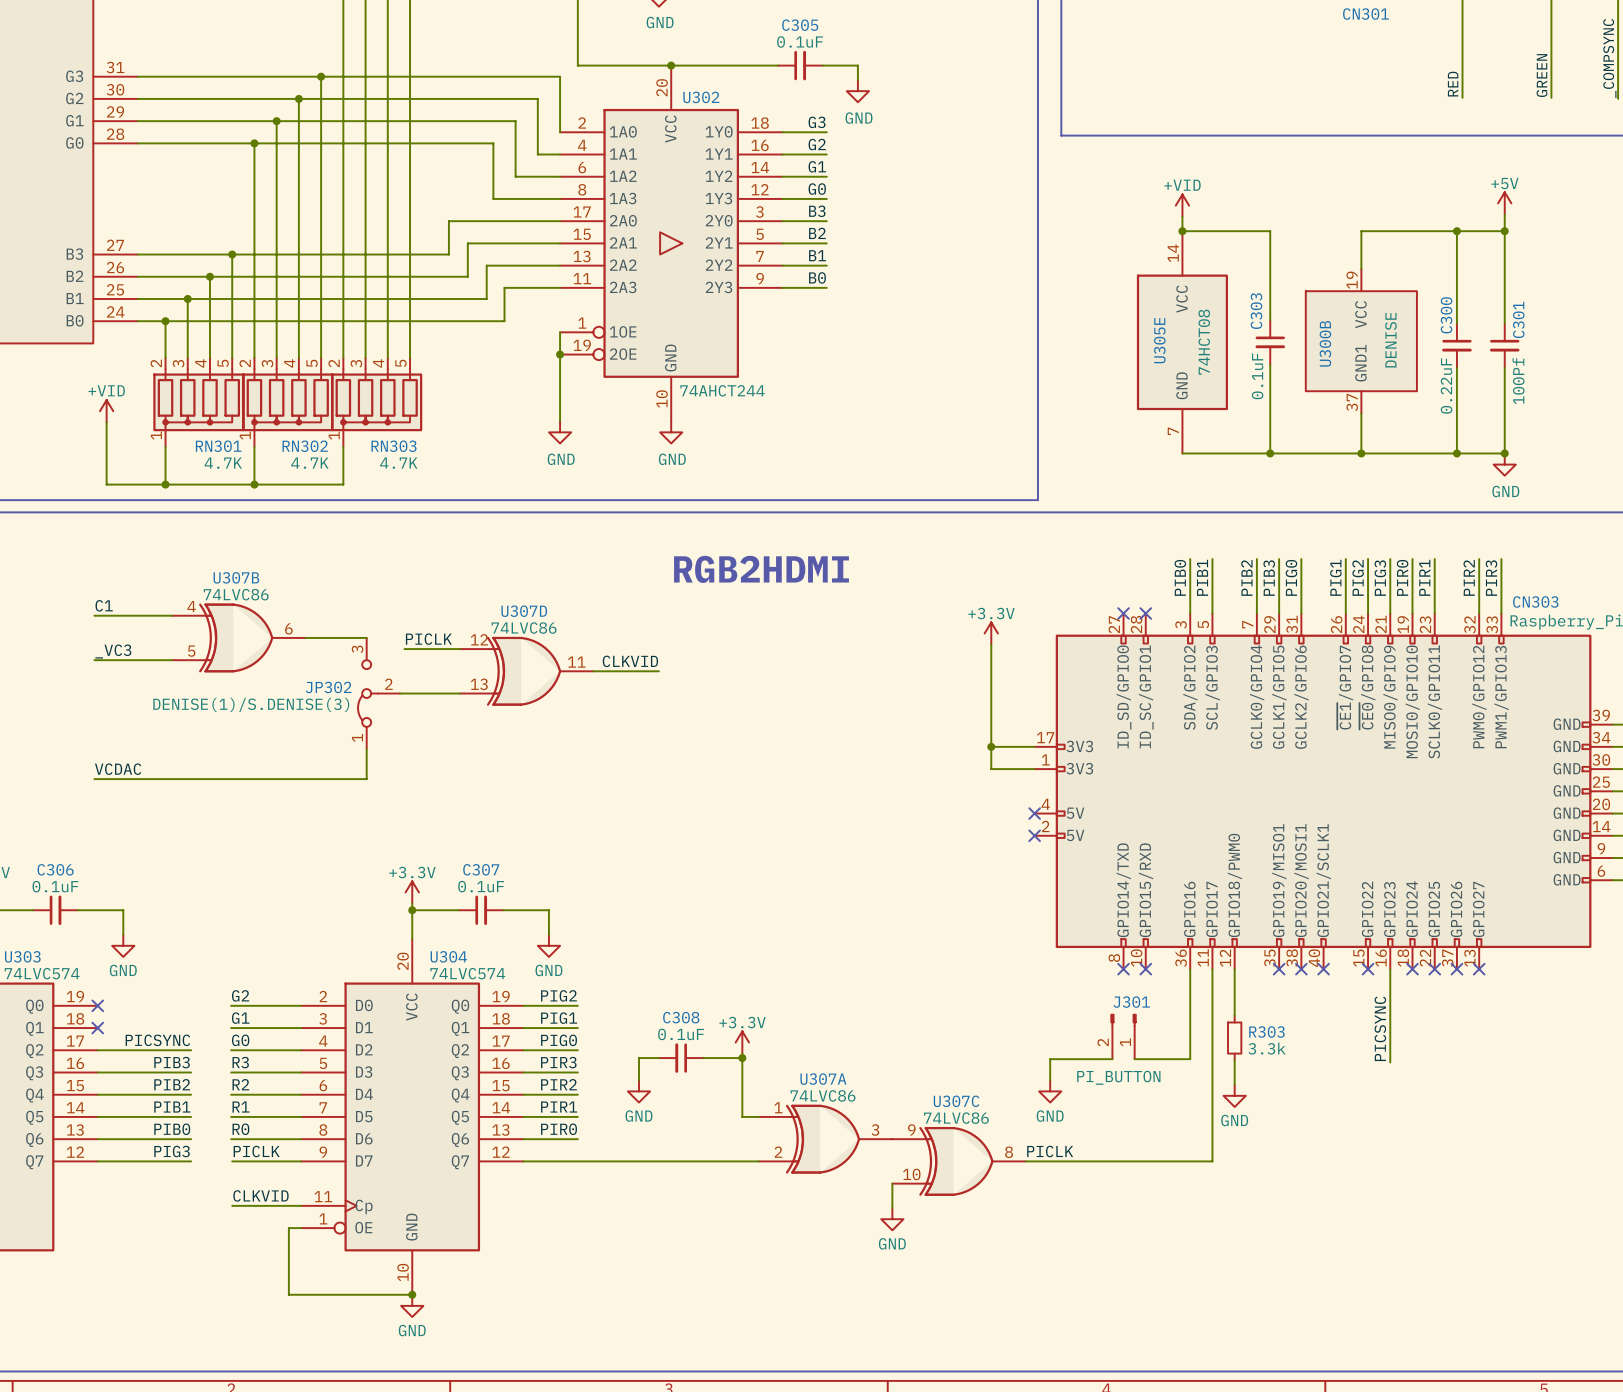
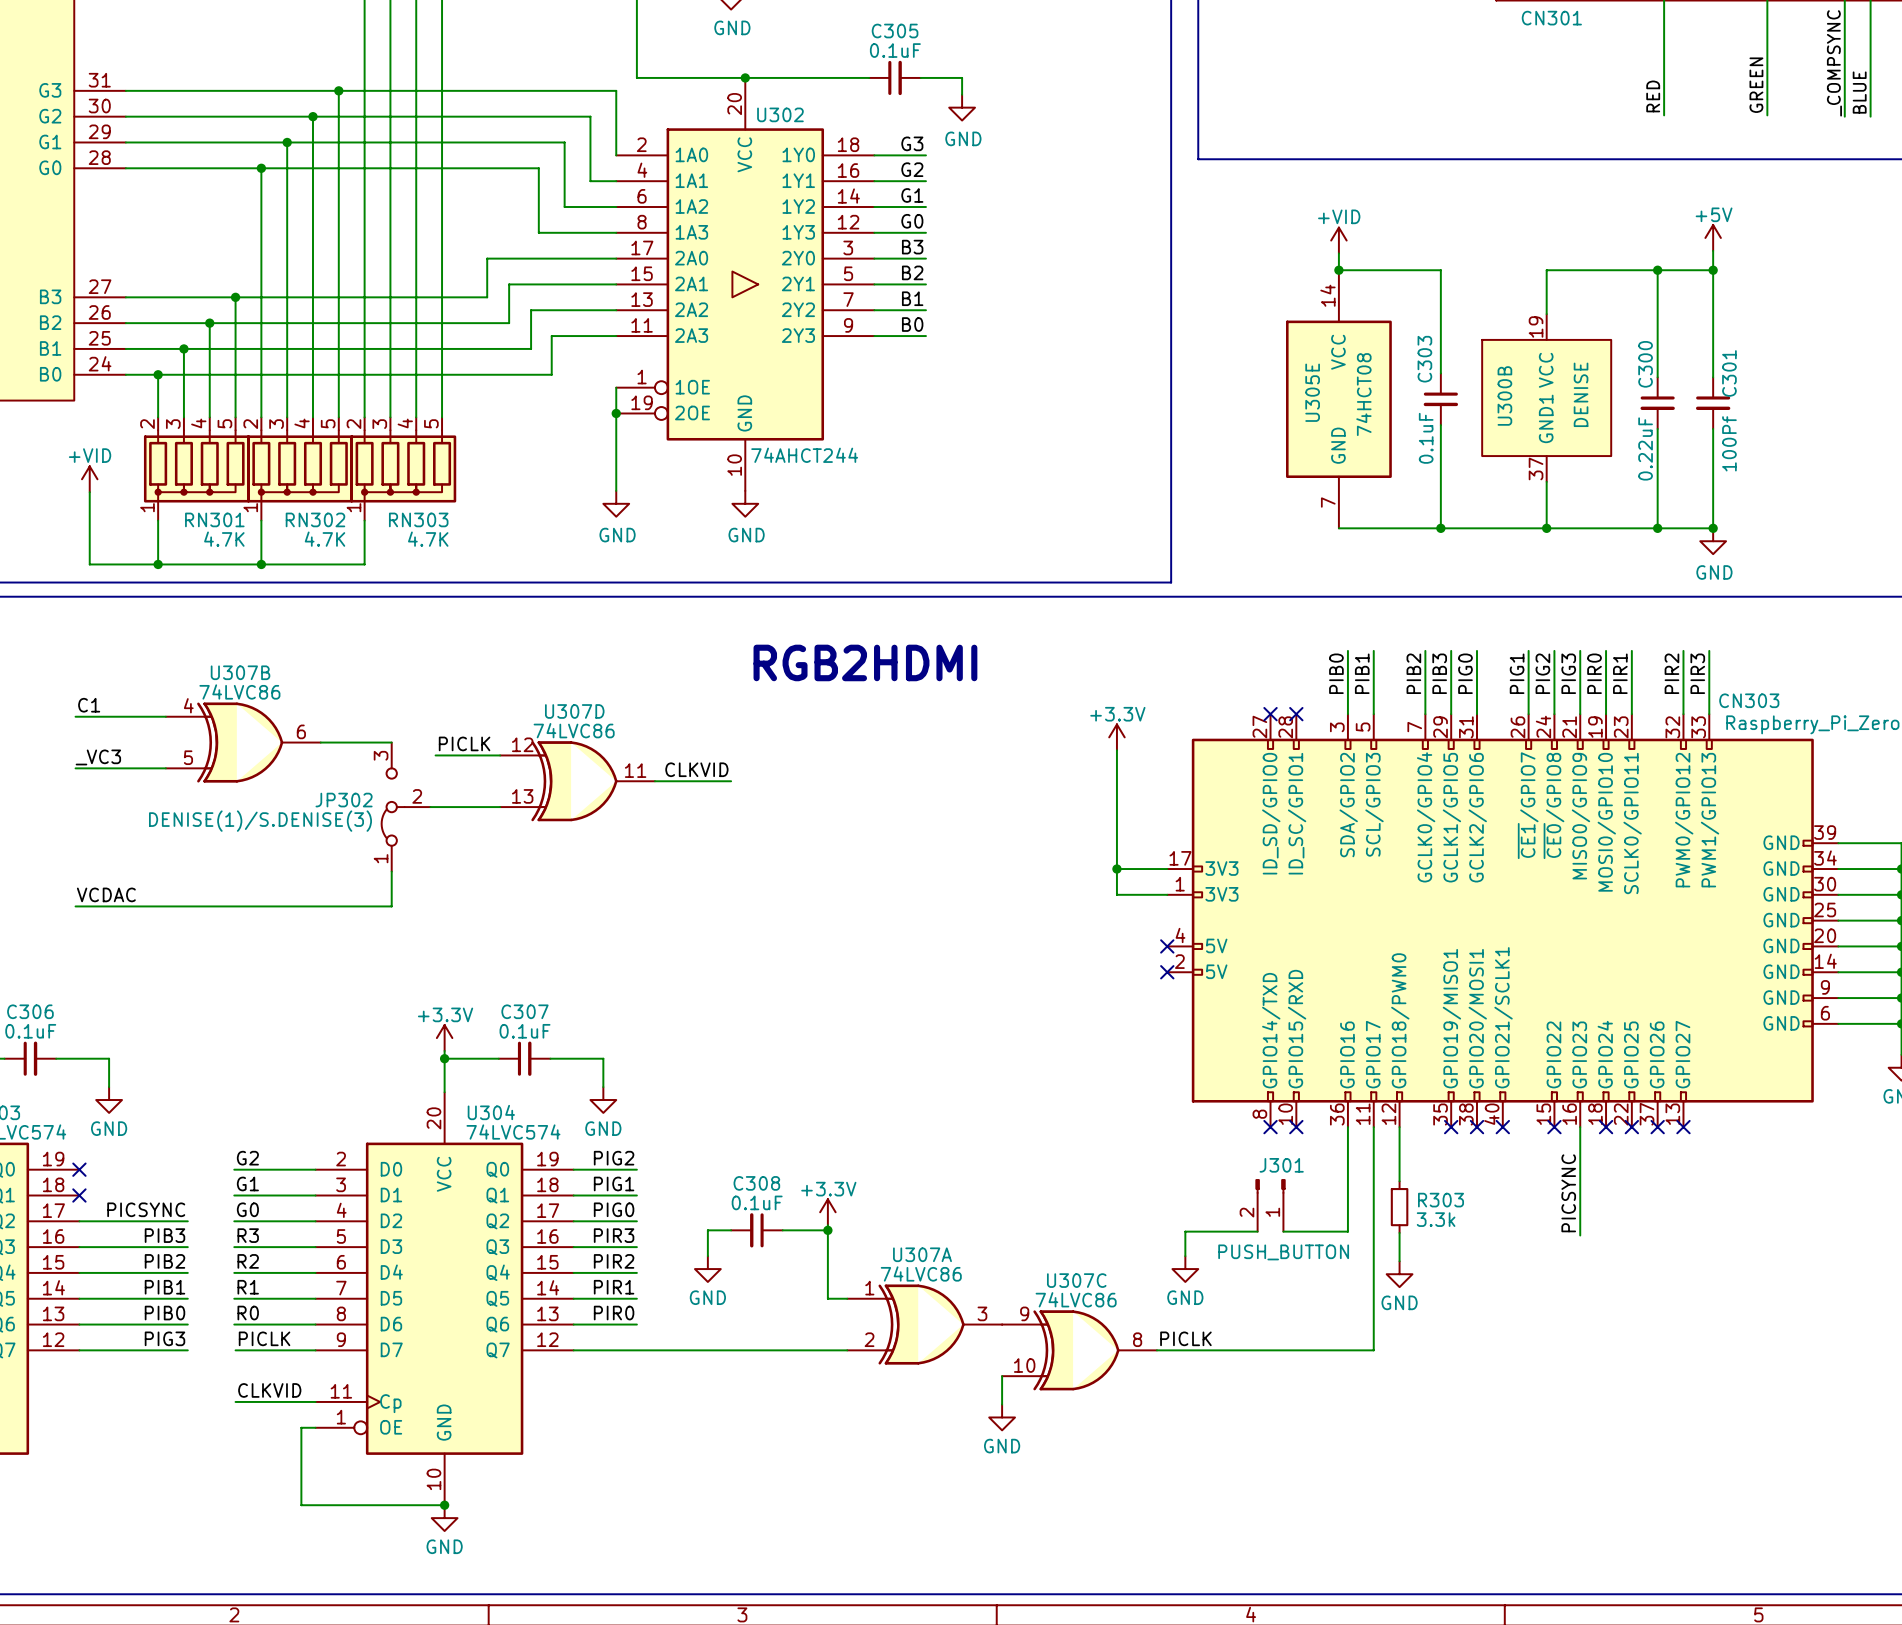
J301 value: PI_BUTTON (1118, 1077) -> PUSH_BUTTON (1283, 1252)

